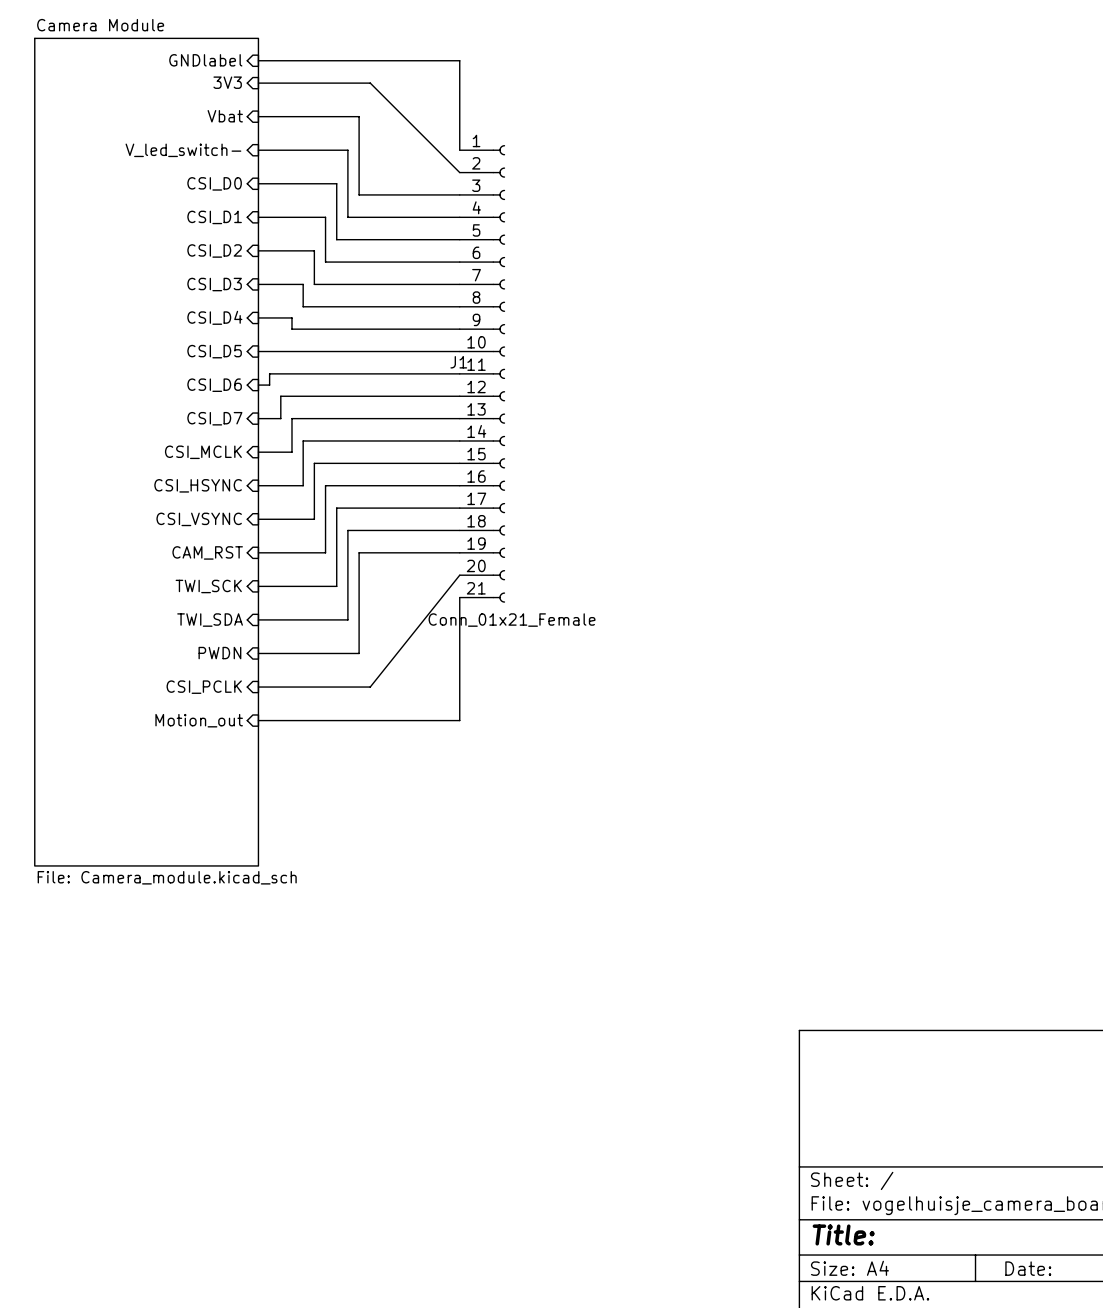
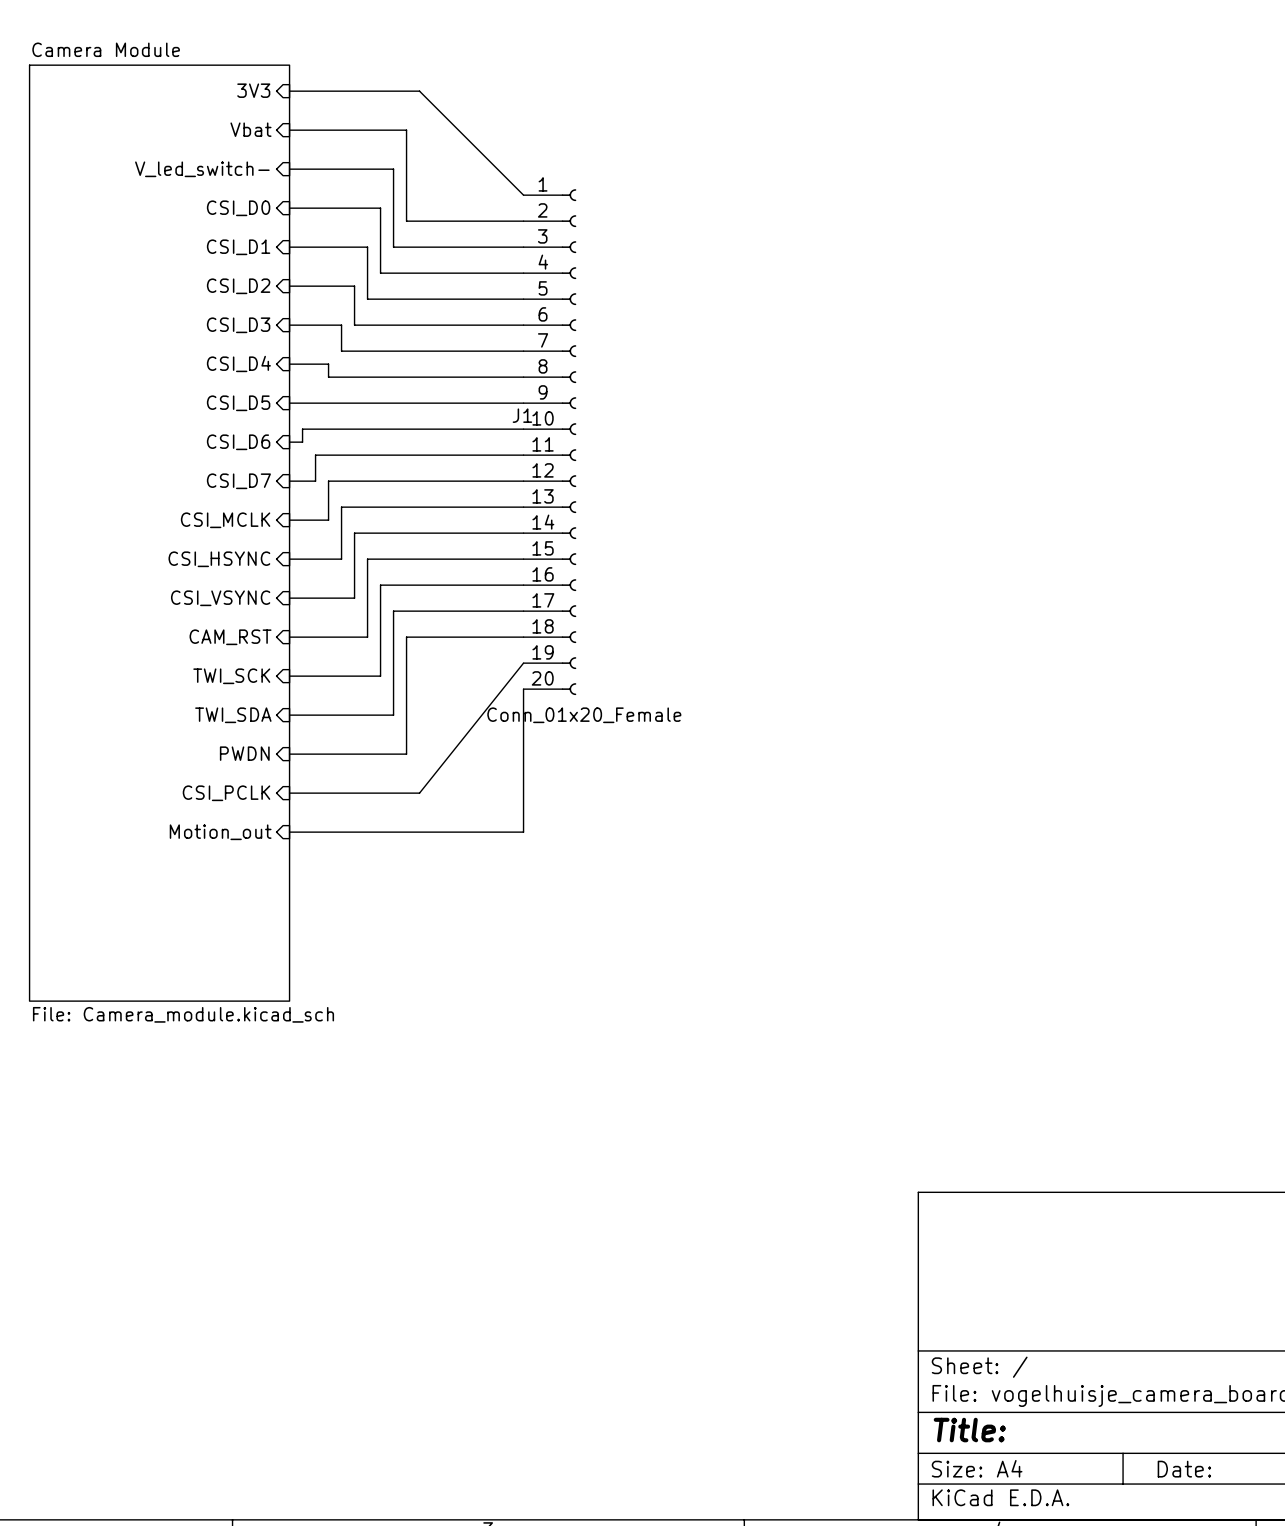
sheet pin: GNDlabel (205, 60) -> none
wire: (258, 60) (459, 60) (459, 150) -> none
J1 symbol: [459, 145, 506, 603] -> [523, 189, 577, 696]
sheet Camera Module: File: Camera_module.kicad_sch (146, 452) -> none
sheet Camera Module: none -> File: Camera_module.kicad_sch (159, 533)
J1 value: Conn_01x21_Female (512, 620) -> Conn_01x20_Female (584, 715)

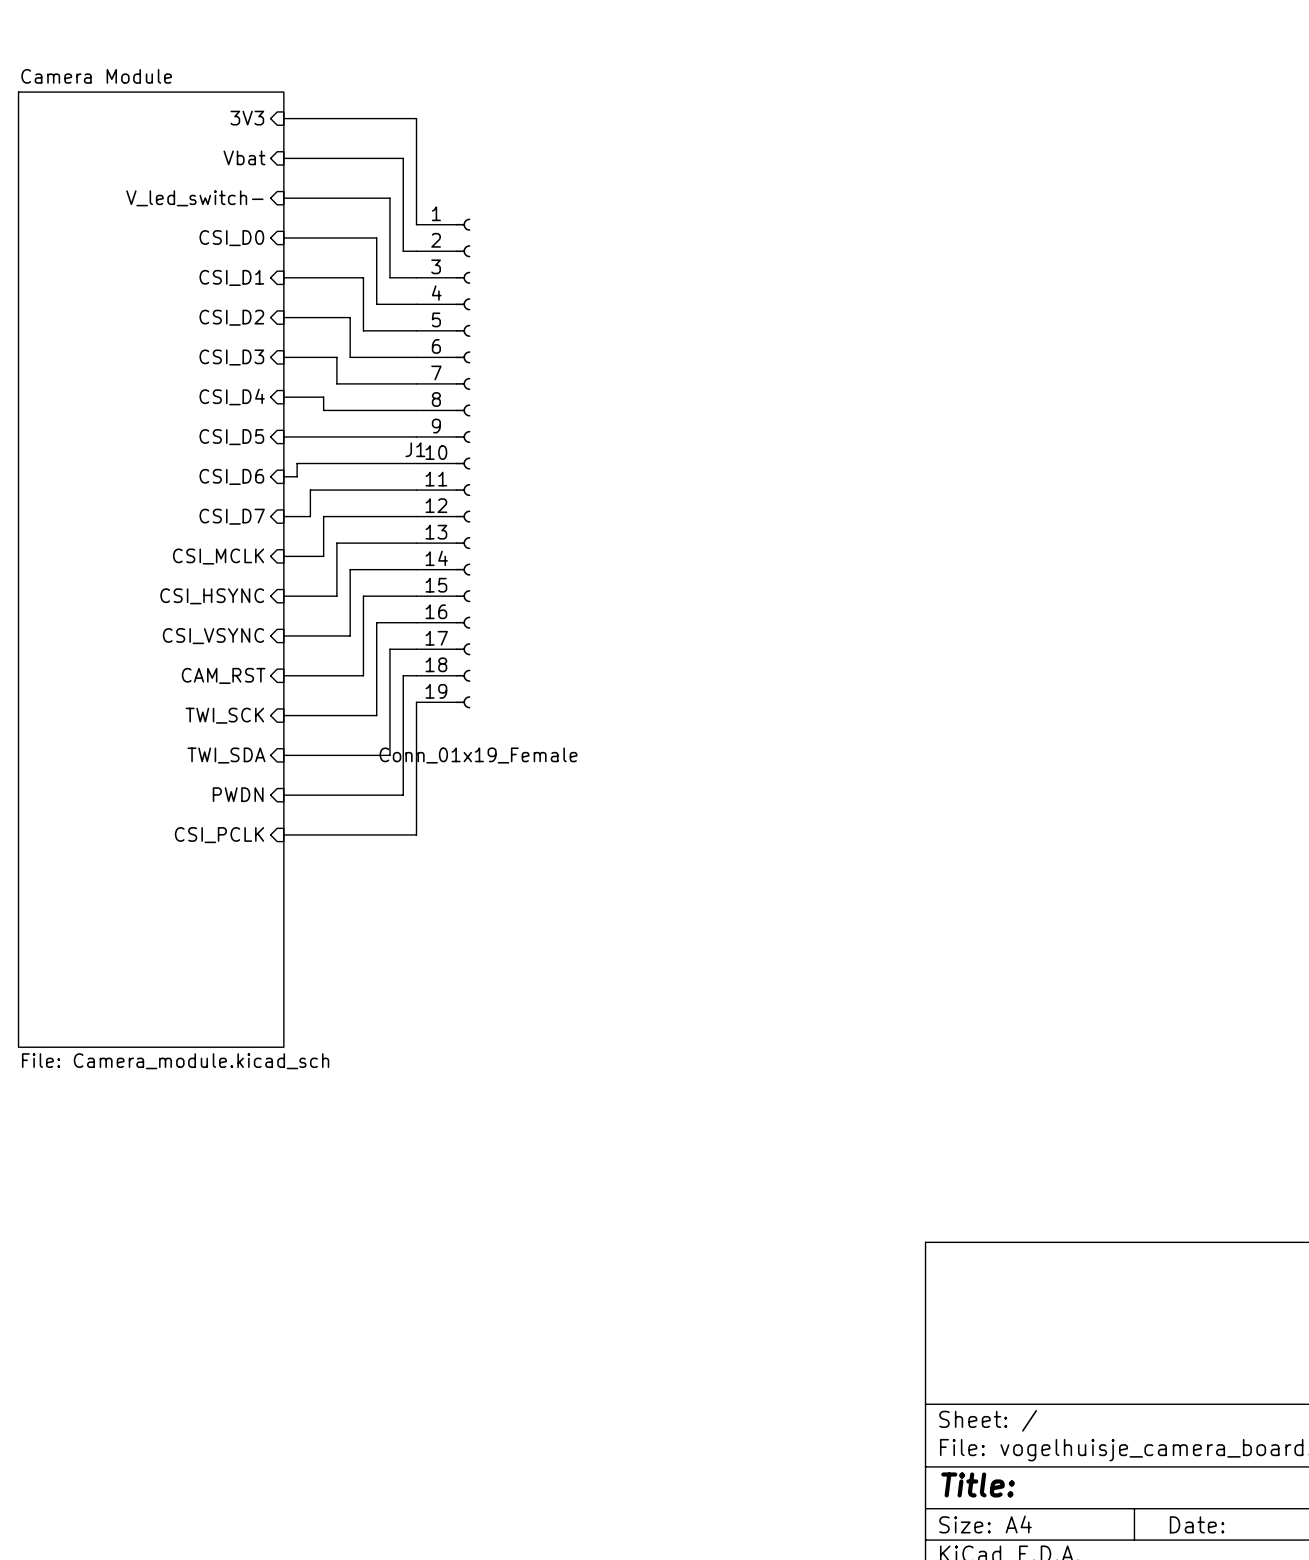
wire: (419, 91) (523, 195) -> (416, 118) (416, 224)
J1 symbol: [523, 189, 577, 696] -> [416, 218, 471, 709]
wire: (419, 221) (523, 221) -> none
wire: (419, 247) (523, 247) -> none
wire: (419, 273) (523, 273) -> none
wire: (419, 299) (523, 299) -> none
wire: (419, 325) (523, 325) -> none
wire: (419, 351) (523, 351) -> none
wire: (419, 377) (523, 377) -> none
wire: (419, 403) (523, 403) -> none
wire: (419, 429) (523, 429) -> none
wire: (419, 455) (523, 455) -> none
wire: (419, 481) (523, 481) -> none
wire: (419, 507) (523, 507) -> none
wire: (419, 533) (523, 533) -> none
wire: (419, 559) (523, 559) -> none
wire: (419, 585) (523, 585) -> none
wire: (419, 611) (523, 611) -> none
wire: (419, 637) (523, 637) -> none
wire: (523, 663) (419, 793) -> (416, 702) (416, 834)
wire: (523, 689) (523, 832) (289, 832) -> none
J1 value: Conn_01x20_Female (584, 715) -> Conn_01x19_Female (478, 755)
sheet pin: Motion_out (220, 832) -> none

